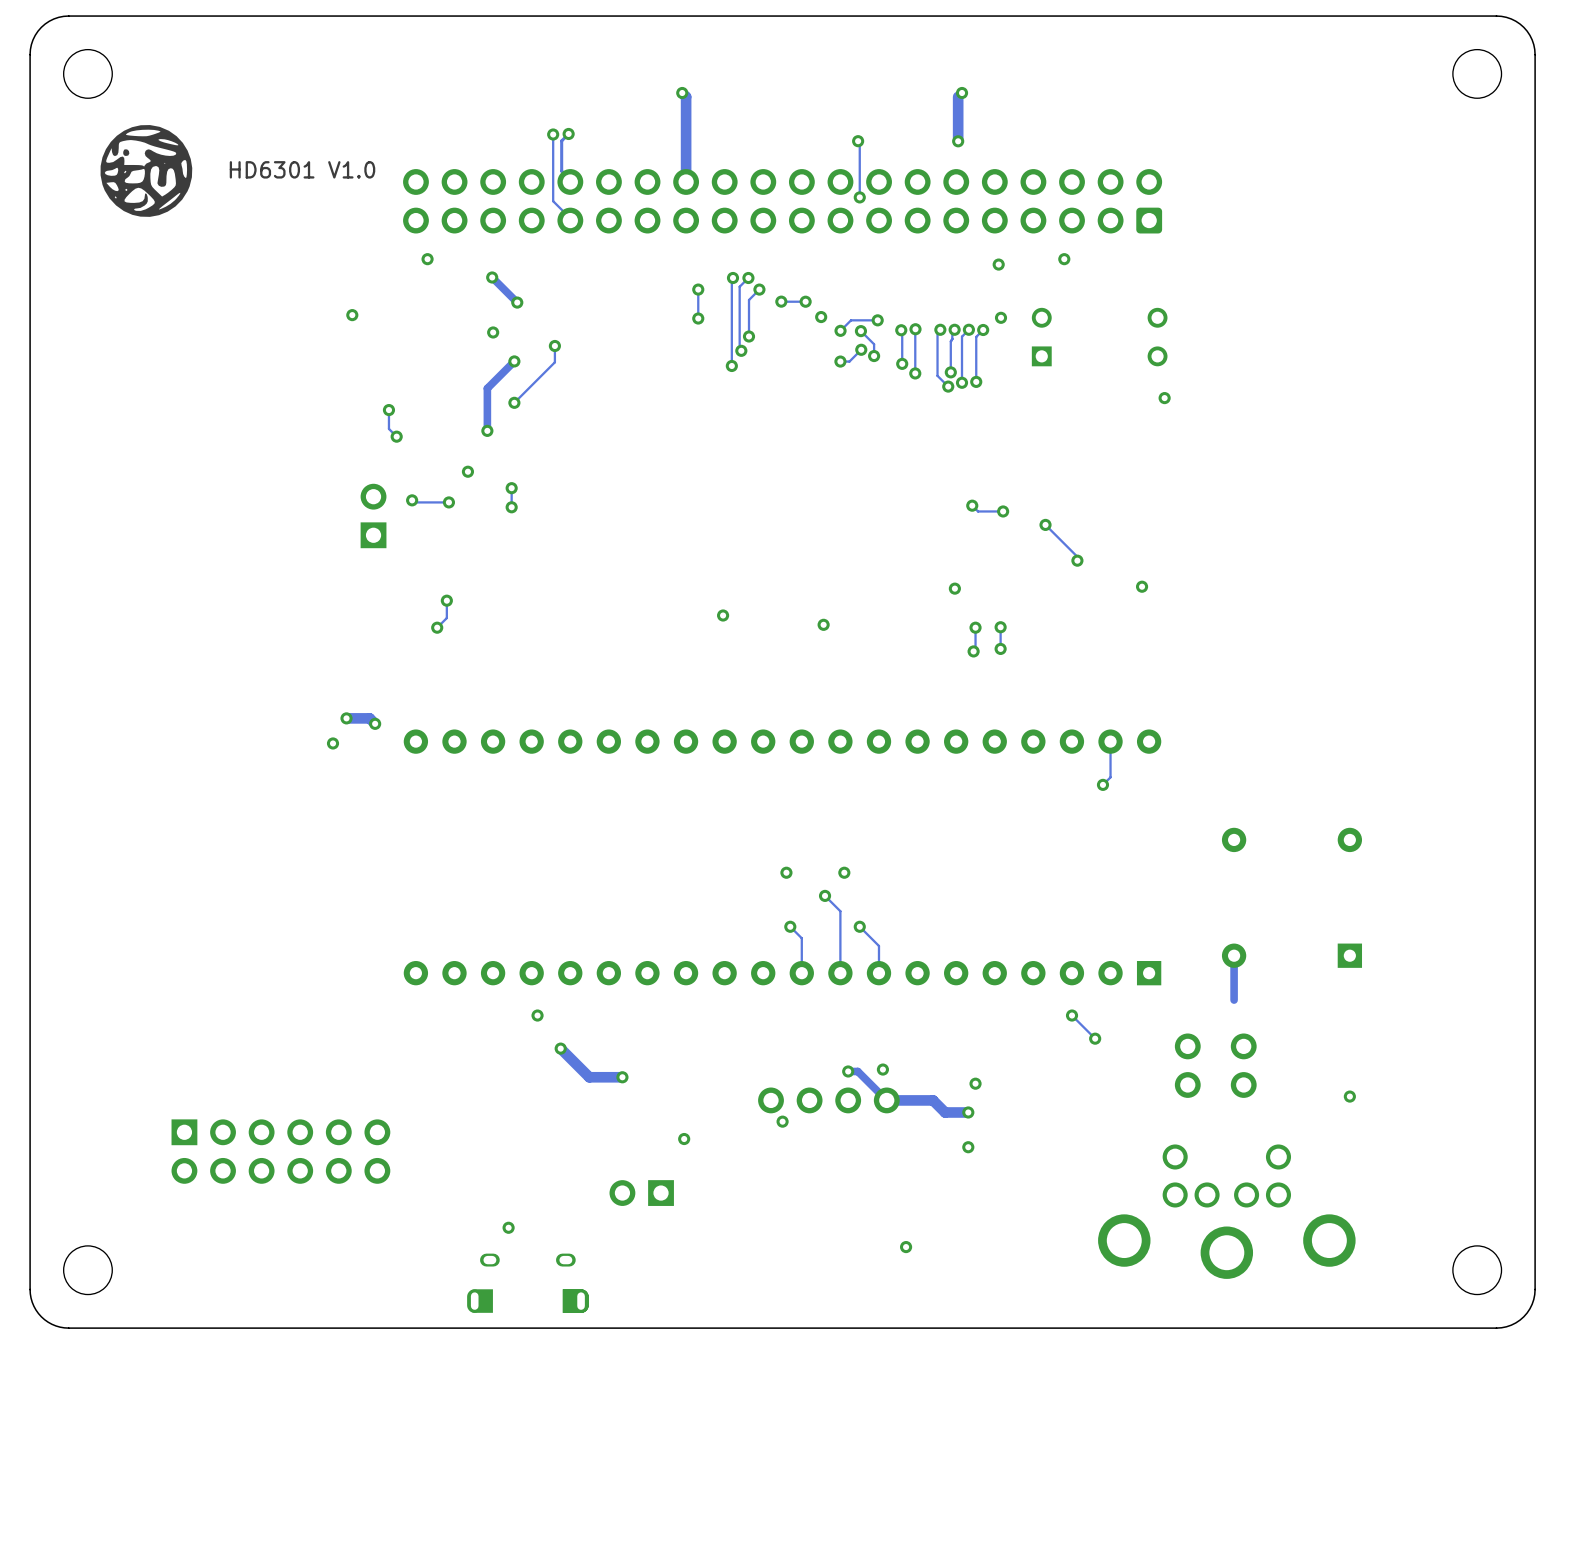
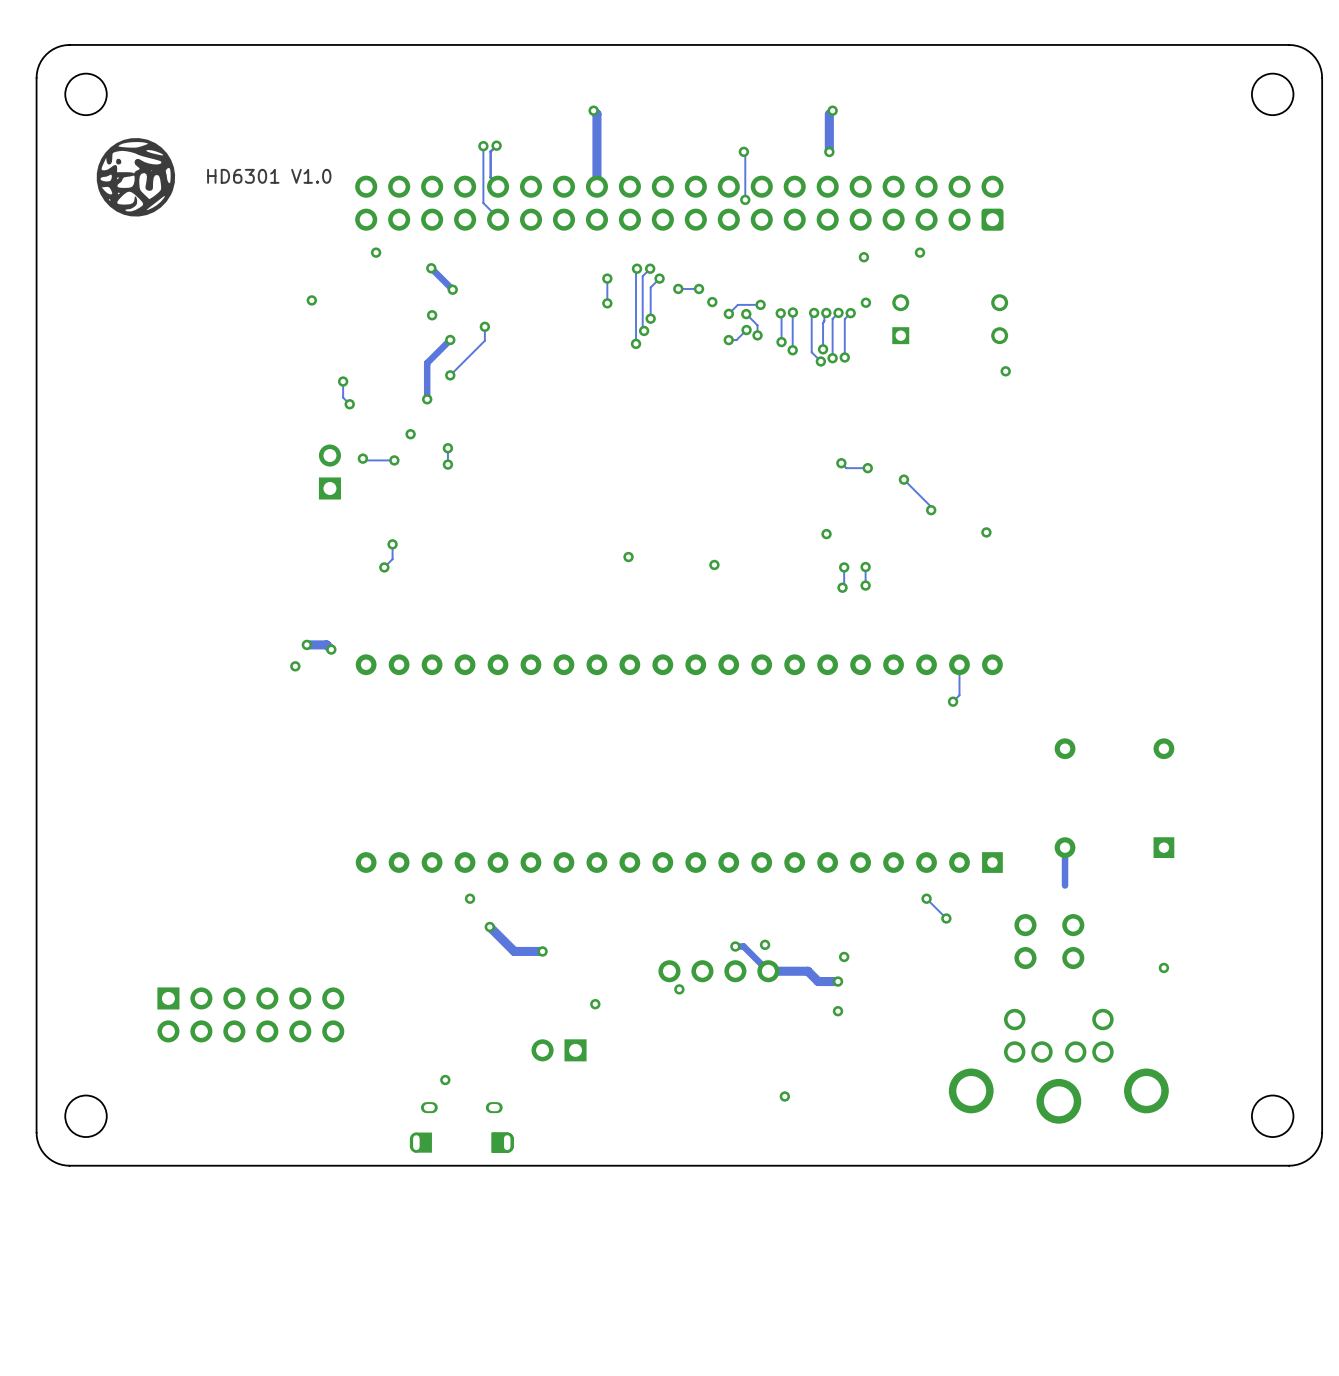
via: (786, 872) -> none
via: (844, 872) -> none
track: (825, 895) (840, 911) (840, 973) -> none
via: (825, 895) -> none
track: (790, 926) (801, 938) (801, 973) -> none
via: (790, 926) -> none
track: (859, 926) (878, 945) (878, 973) -> none
via: (859, 926) -> none

